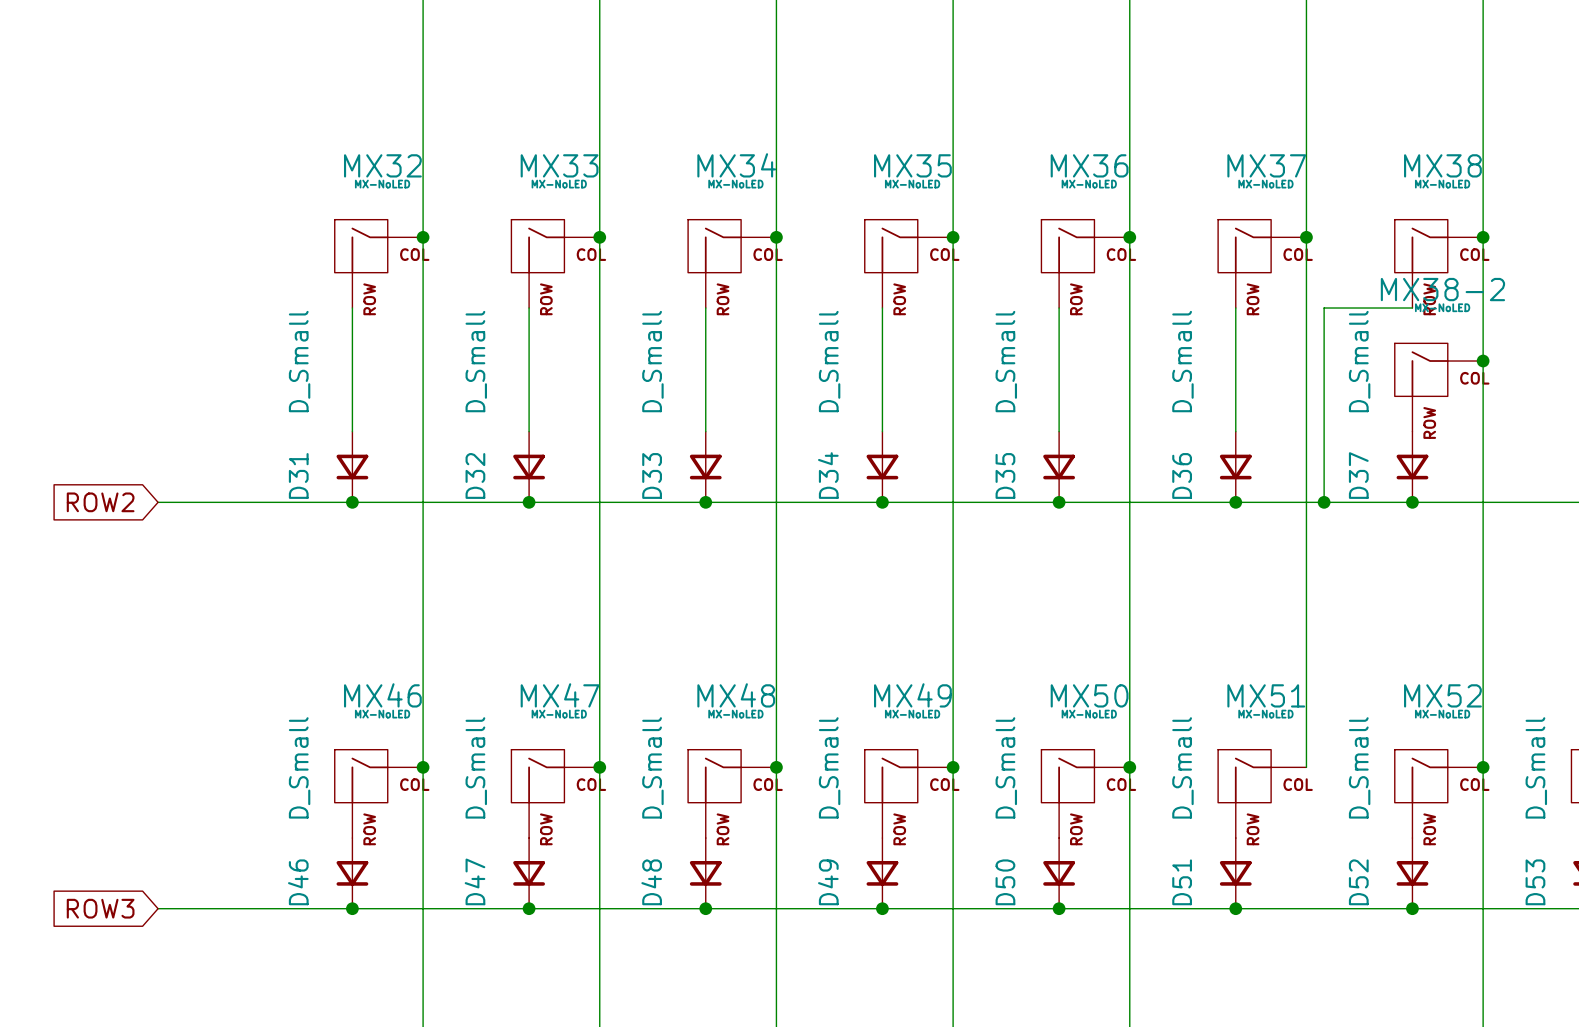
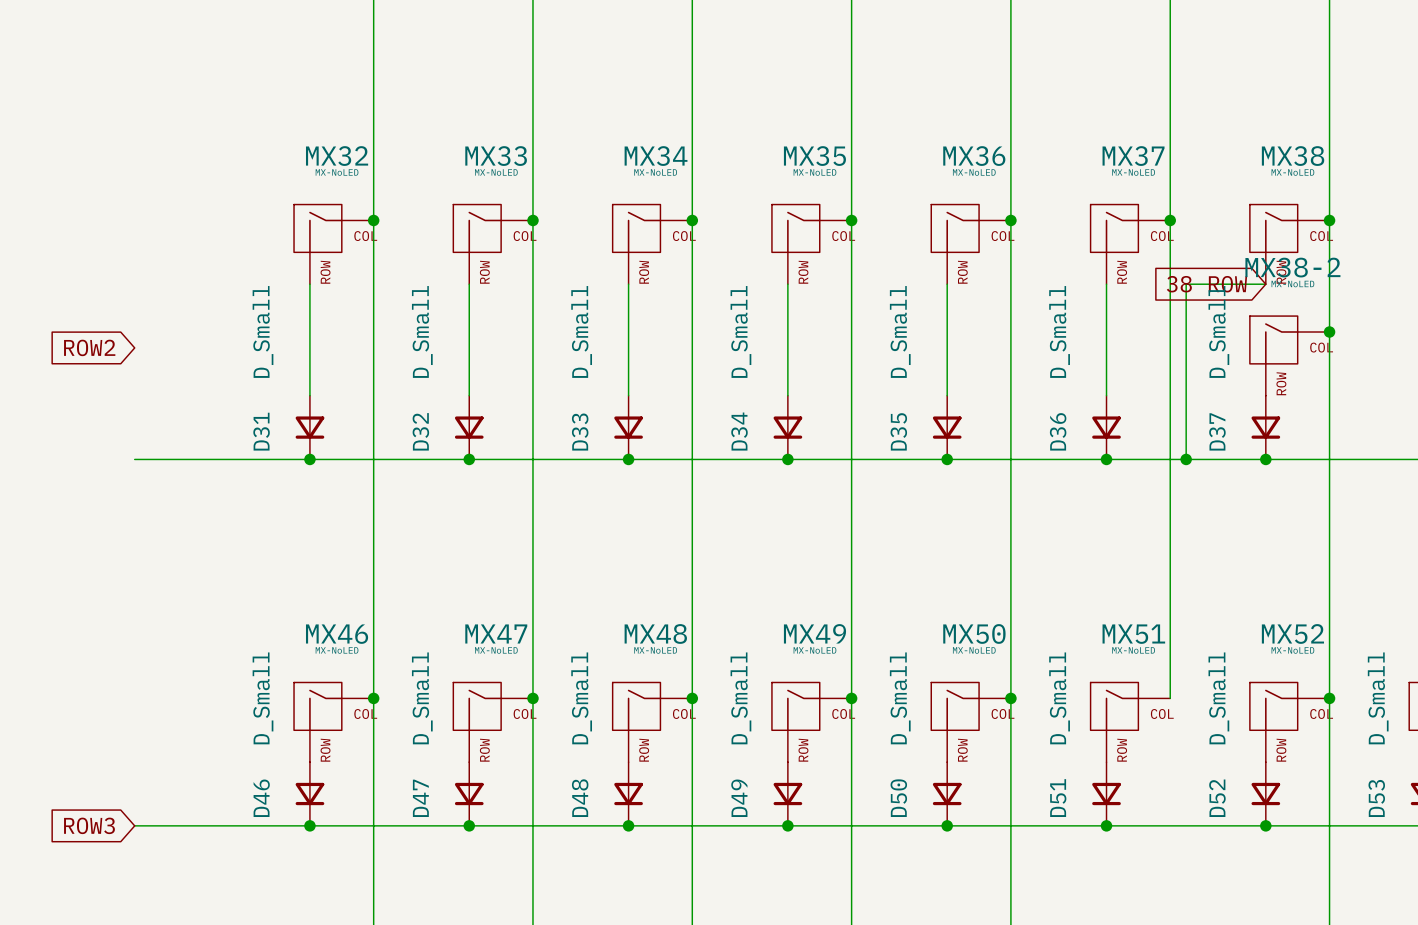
global label: none -> 38 ROW (1206, 284)
global label position: ROW2 (100, 502) -> ROW2 (89, 347)

